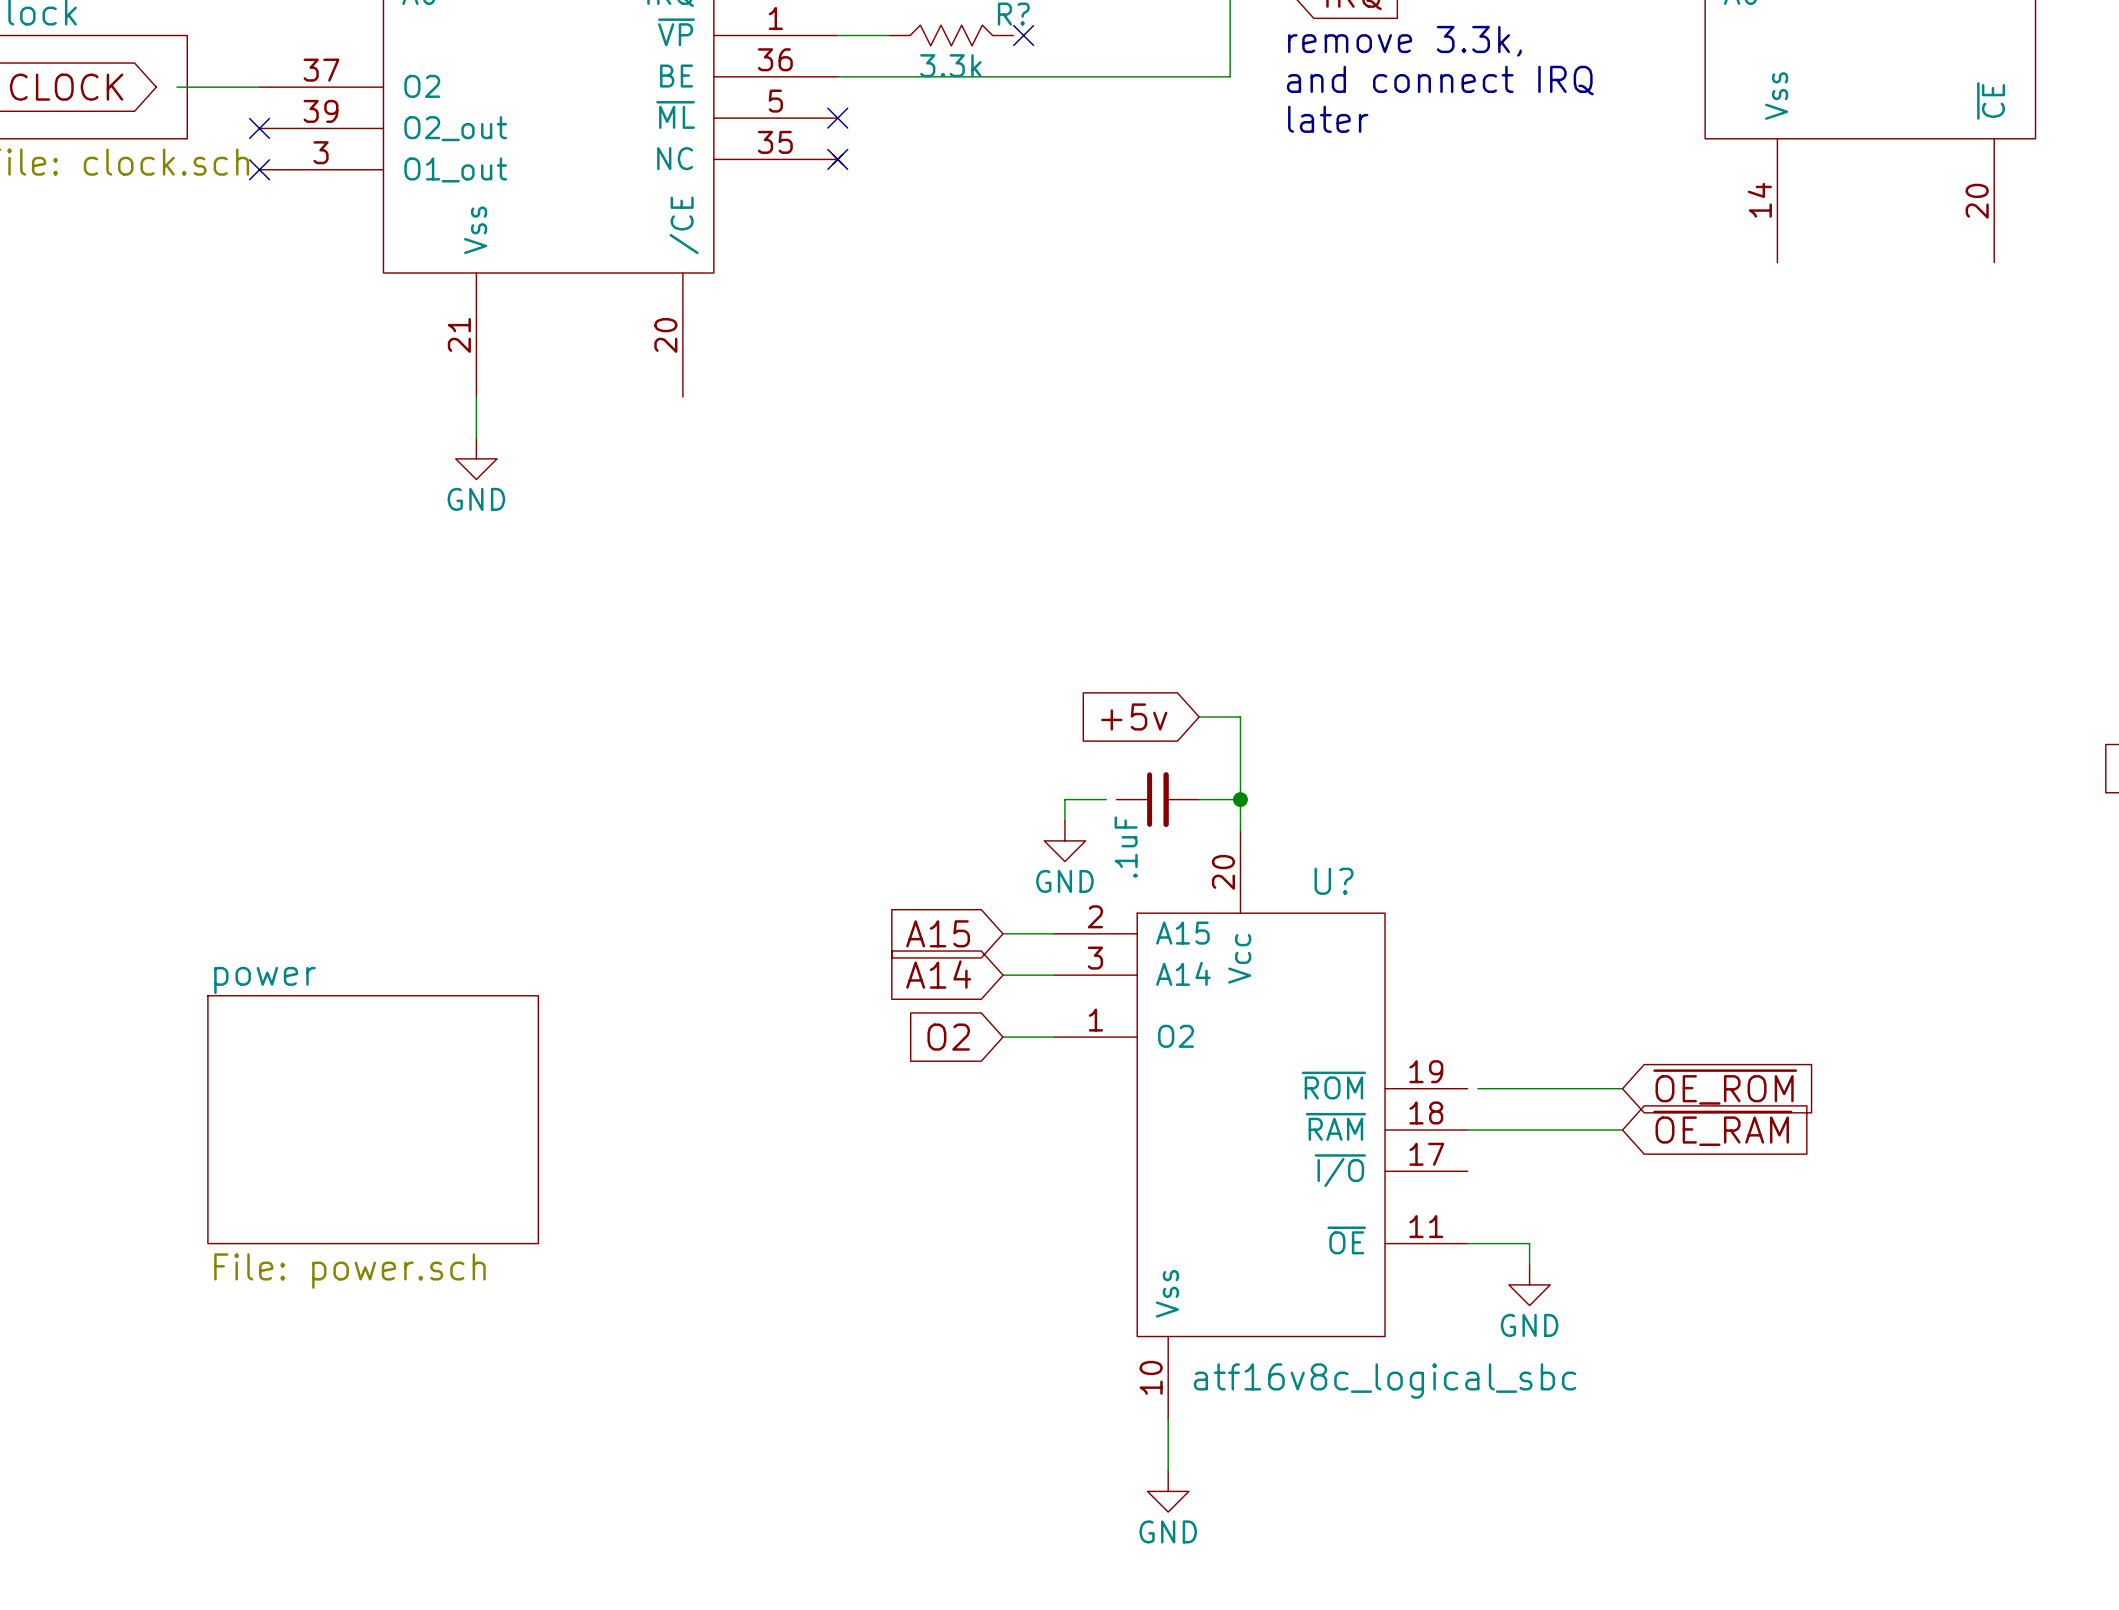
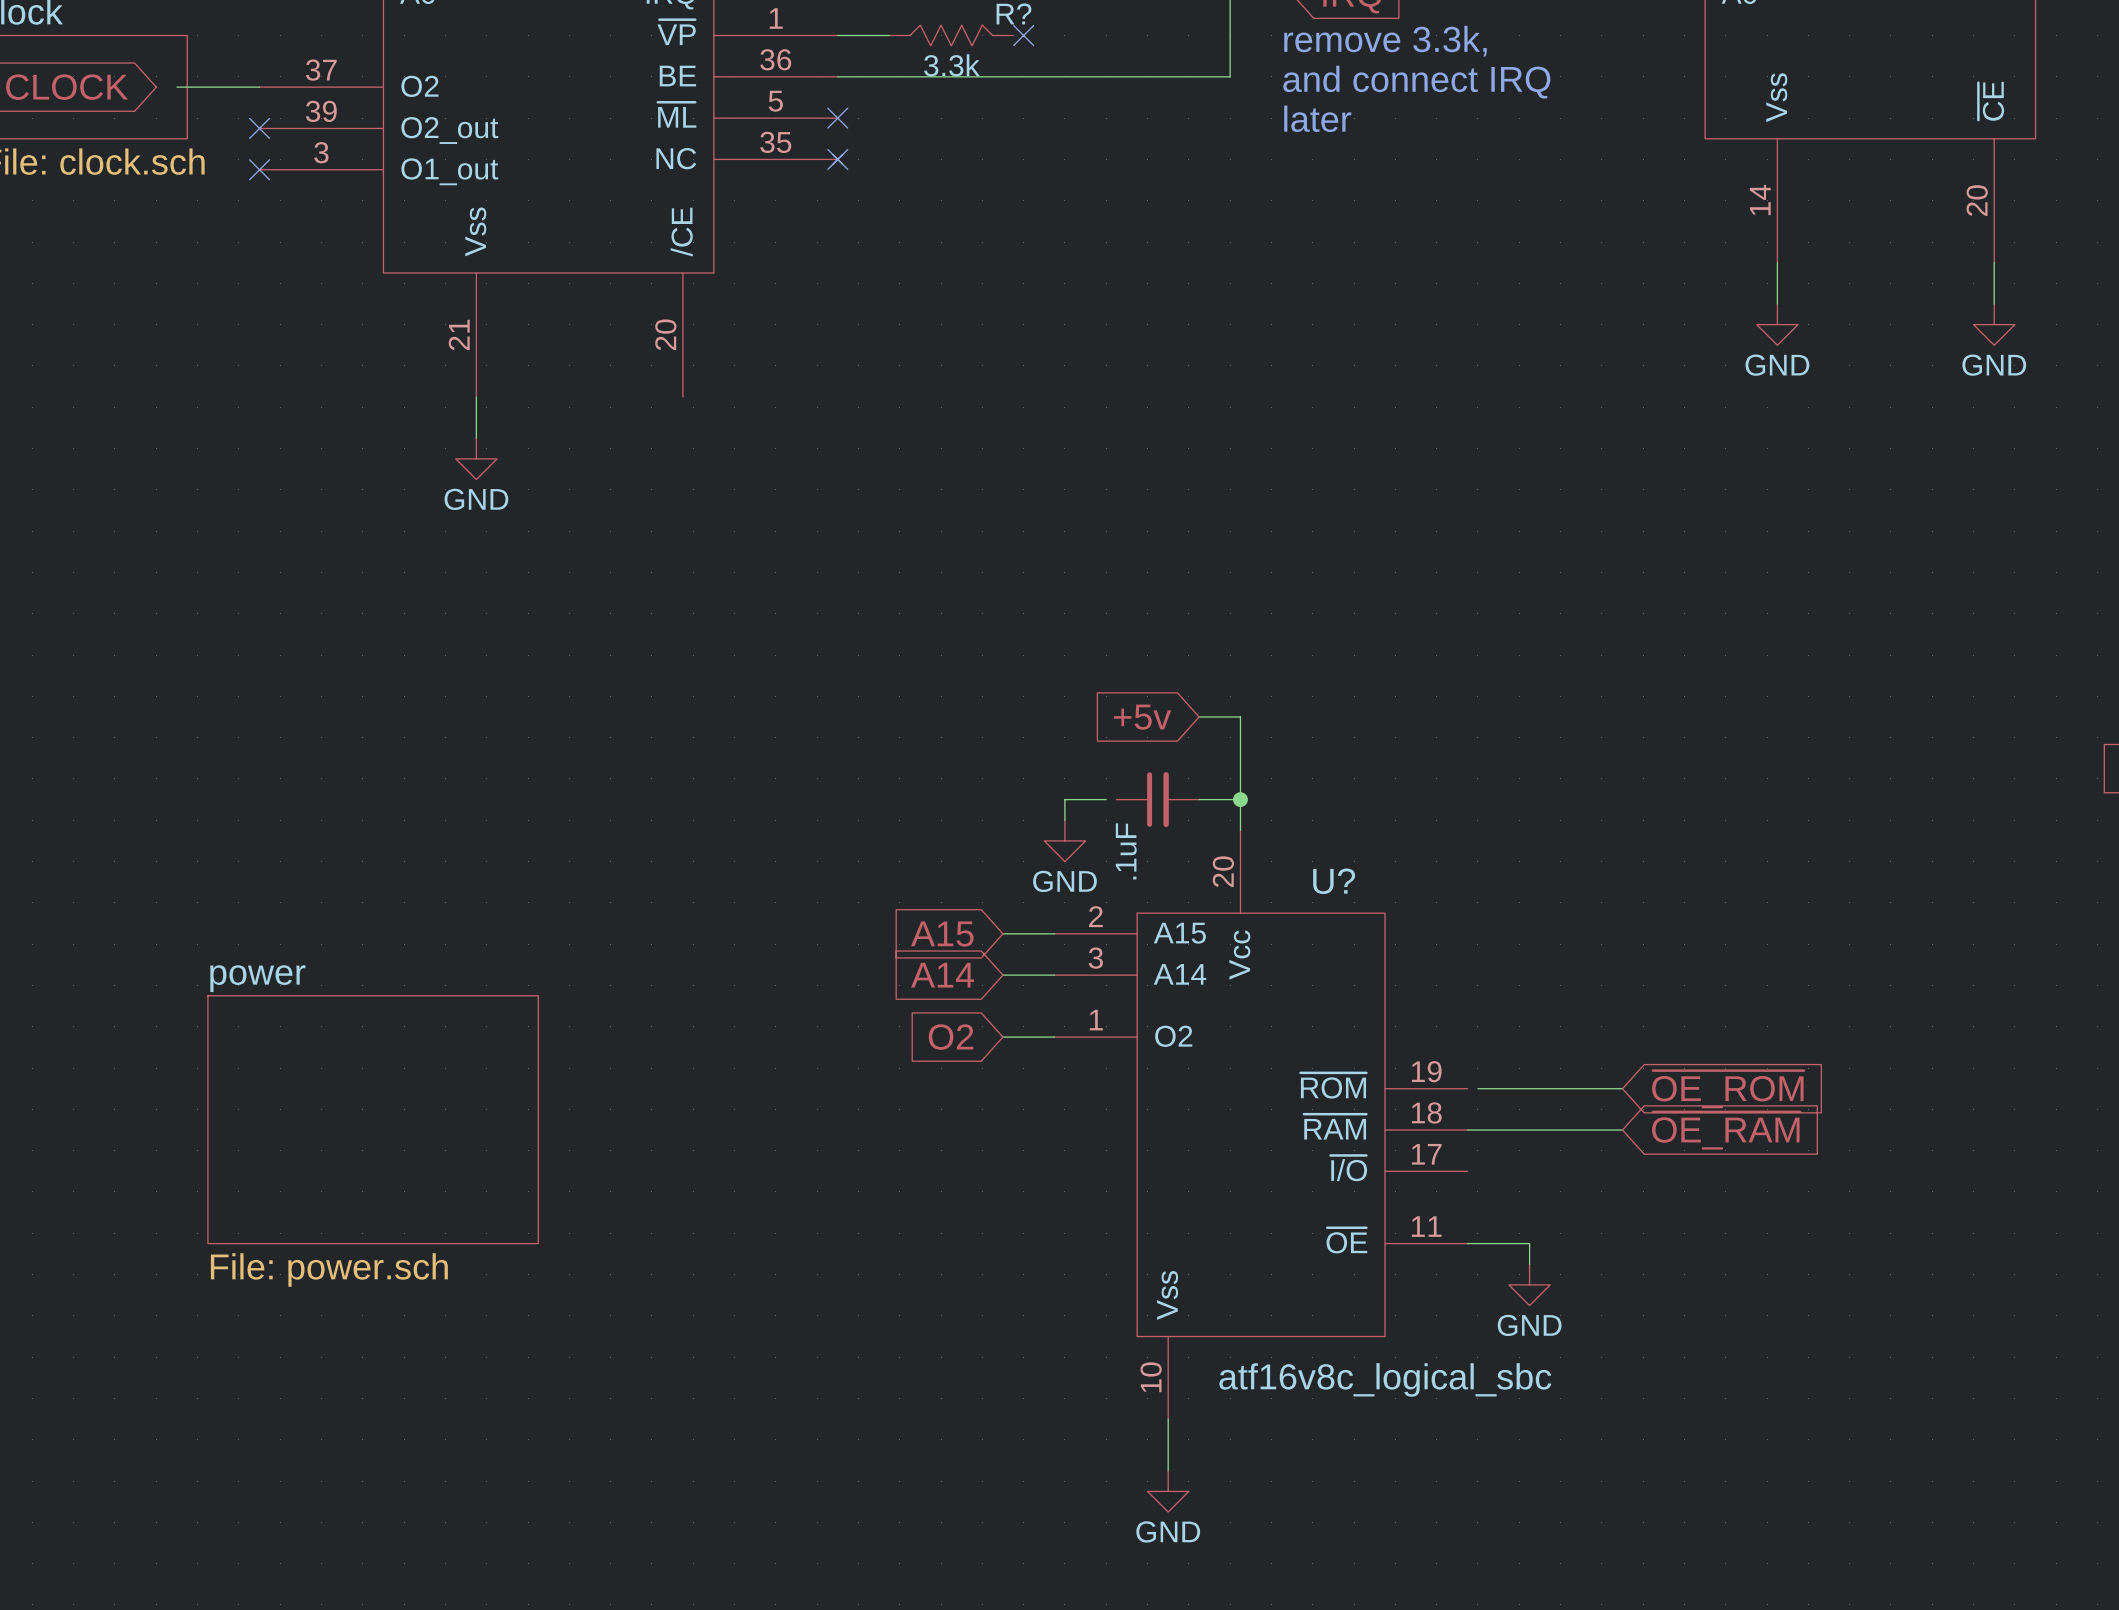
wire: none -> (1777, 262) (1777, 303)
wire: none -> (1994, 262) (1994, 303)
power symbol: none -> GND (1777, 324)
power symbol: none -> GND (1994, 324)

